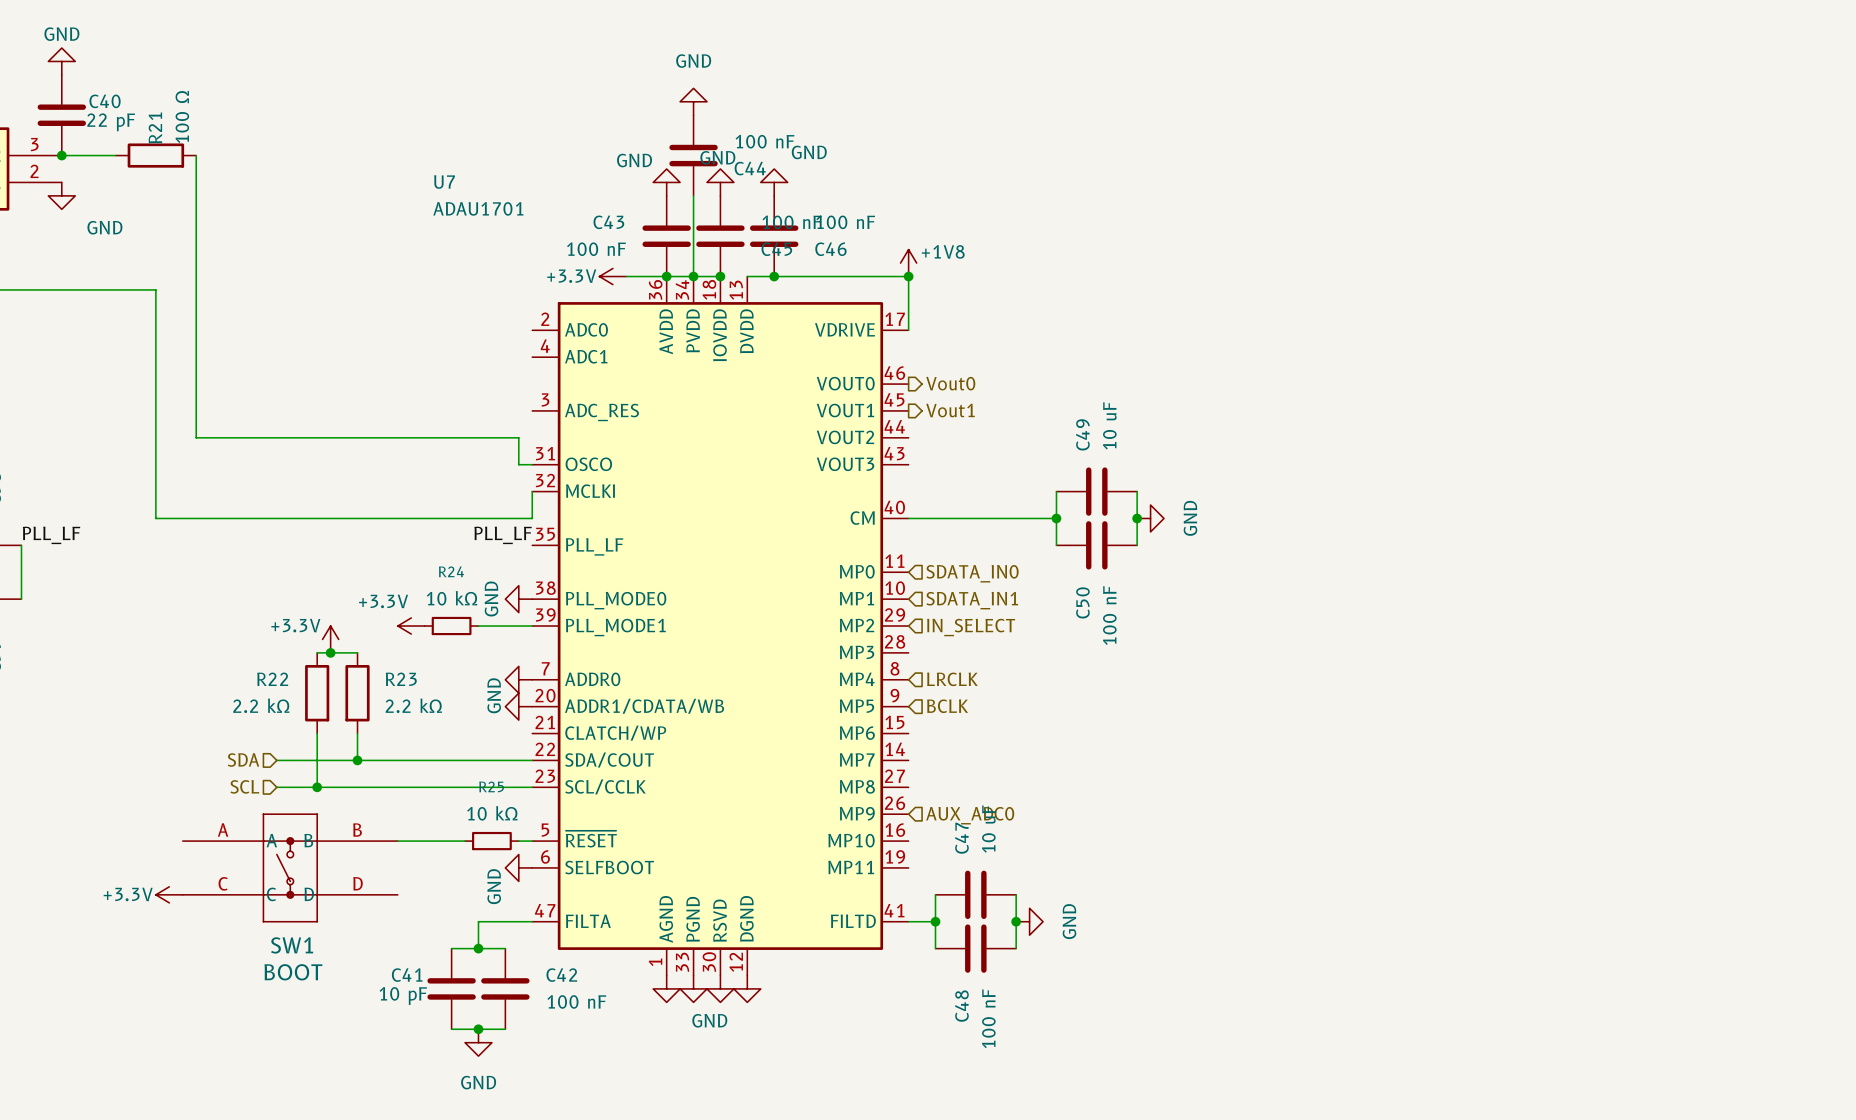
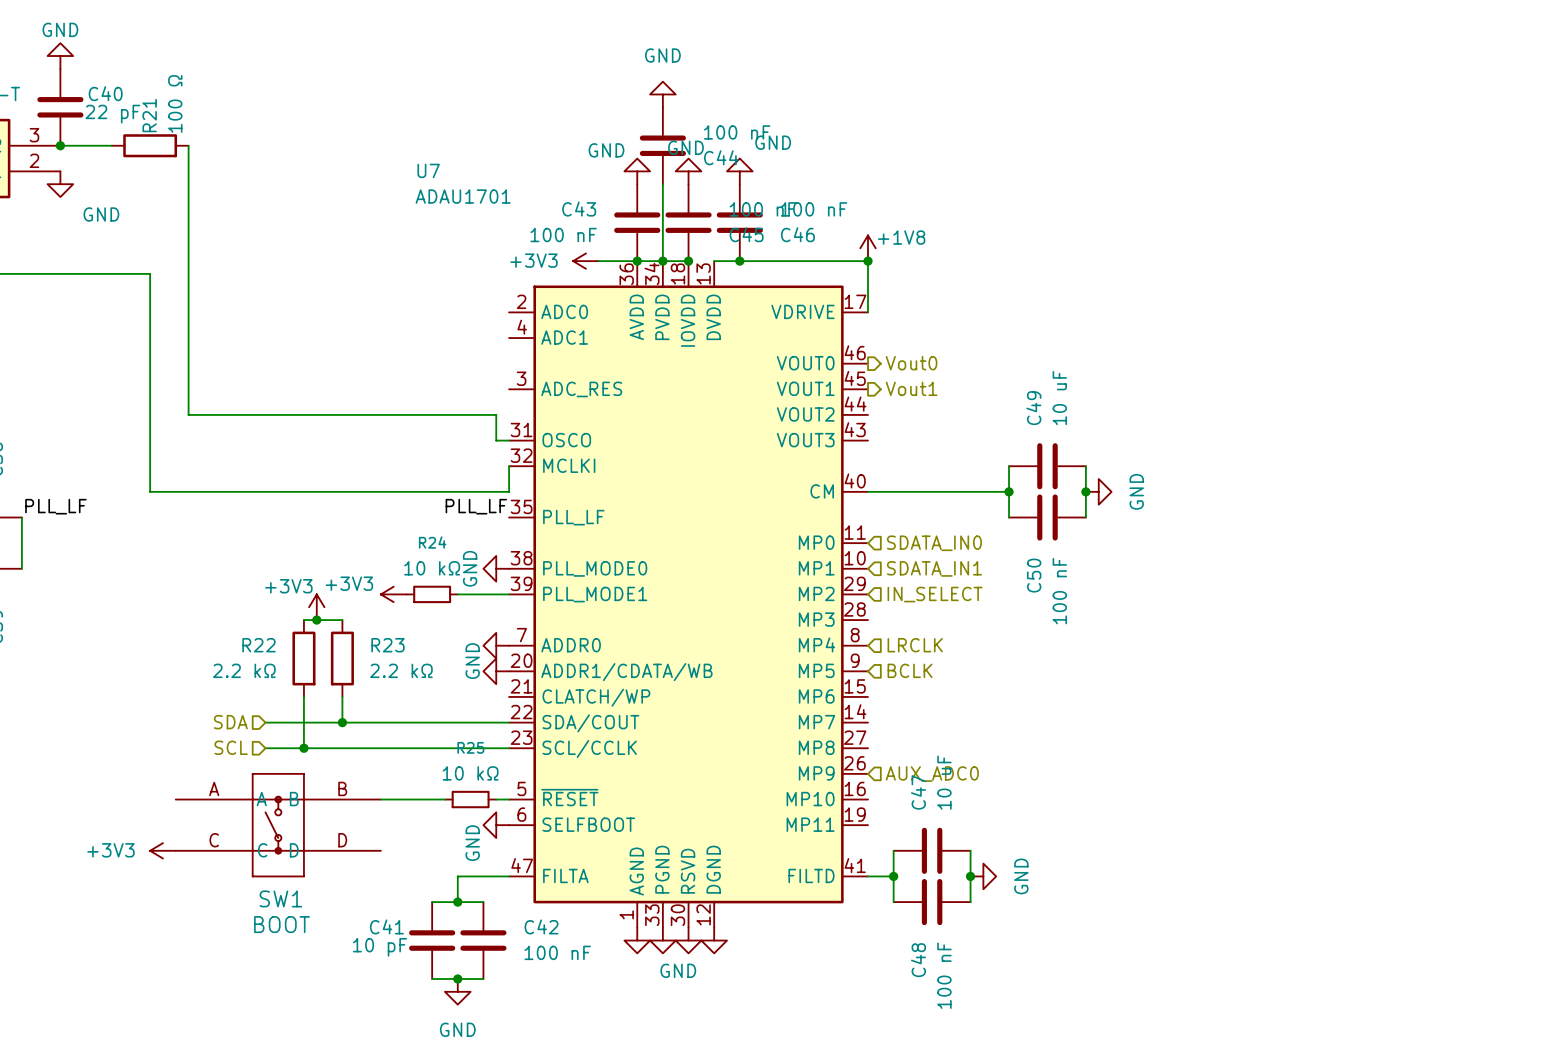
power symbol: +3.3V (612, 276) -> +3V3 (585, 261)
power symbol: +3.3V (411, 626) -> +3V3 (393, 594)
power symbol: +3.3V (330, 639) -> +3V3 (316, 607)
power symbol: +3.3V (169, 894) -> +3V3 (162, 850)

